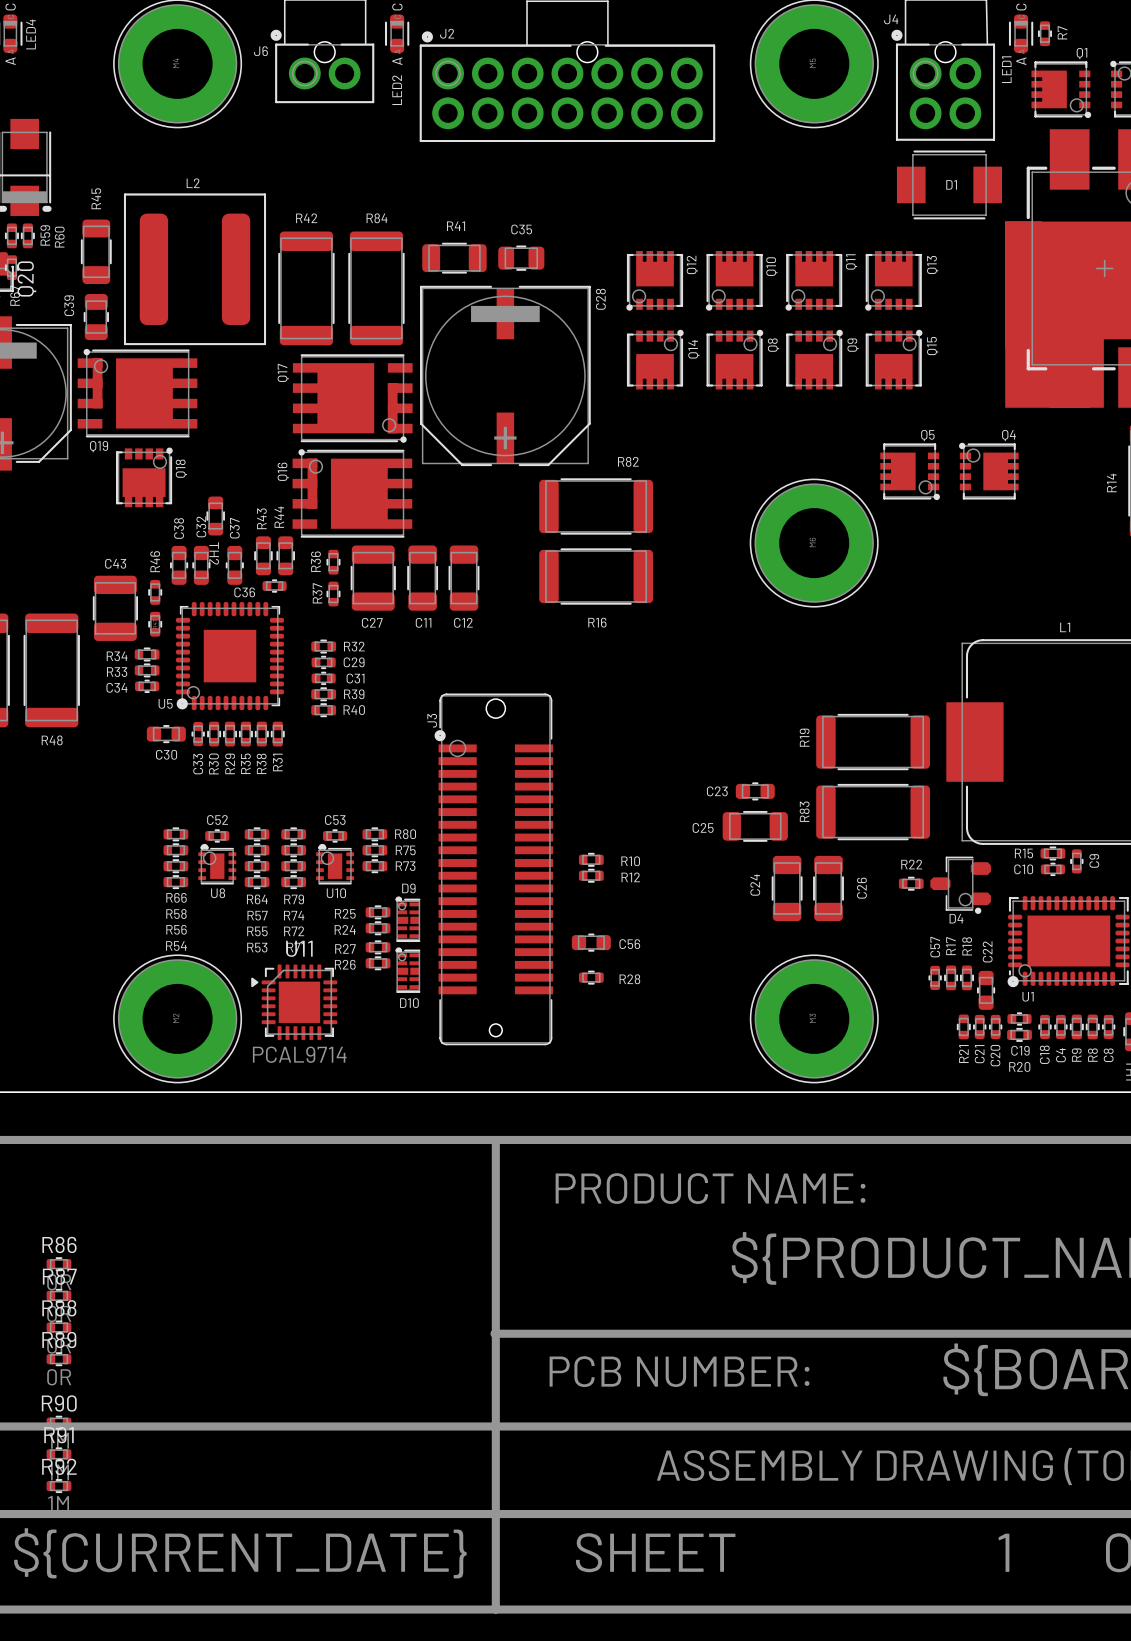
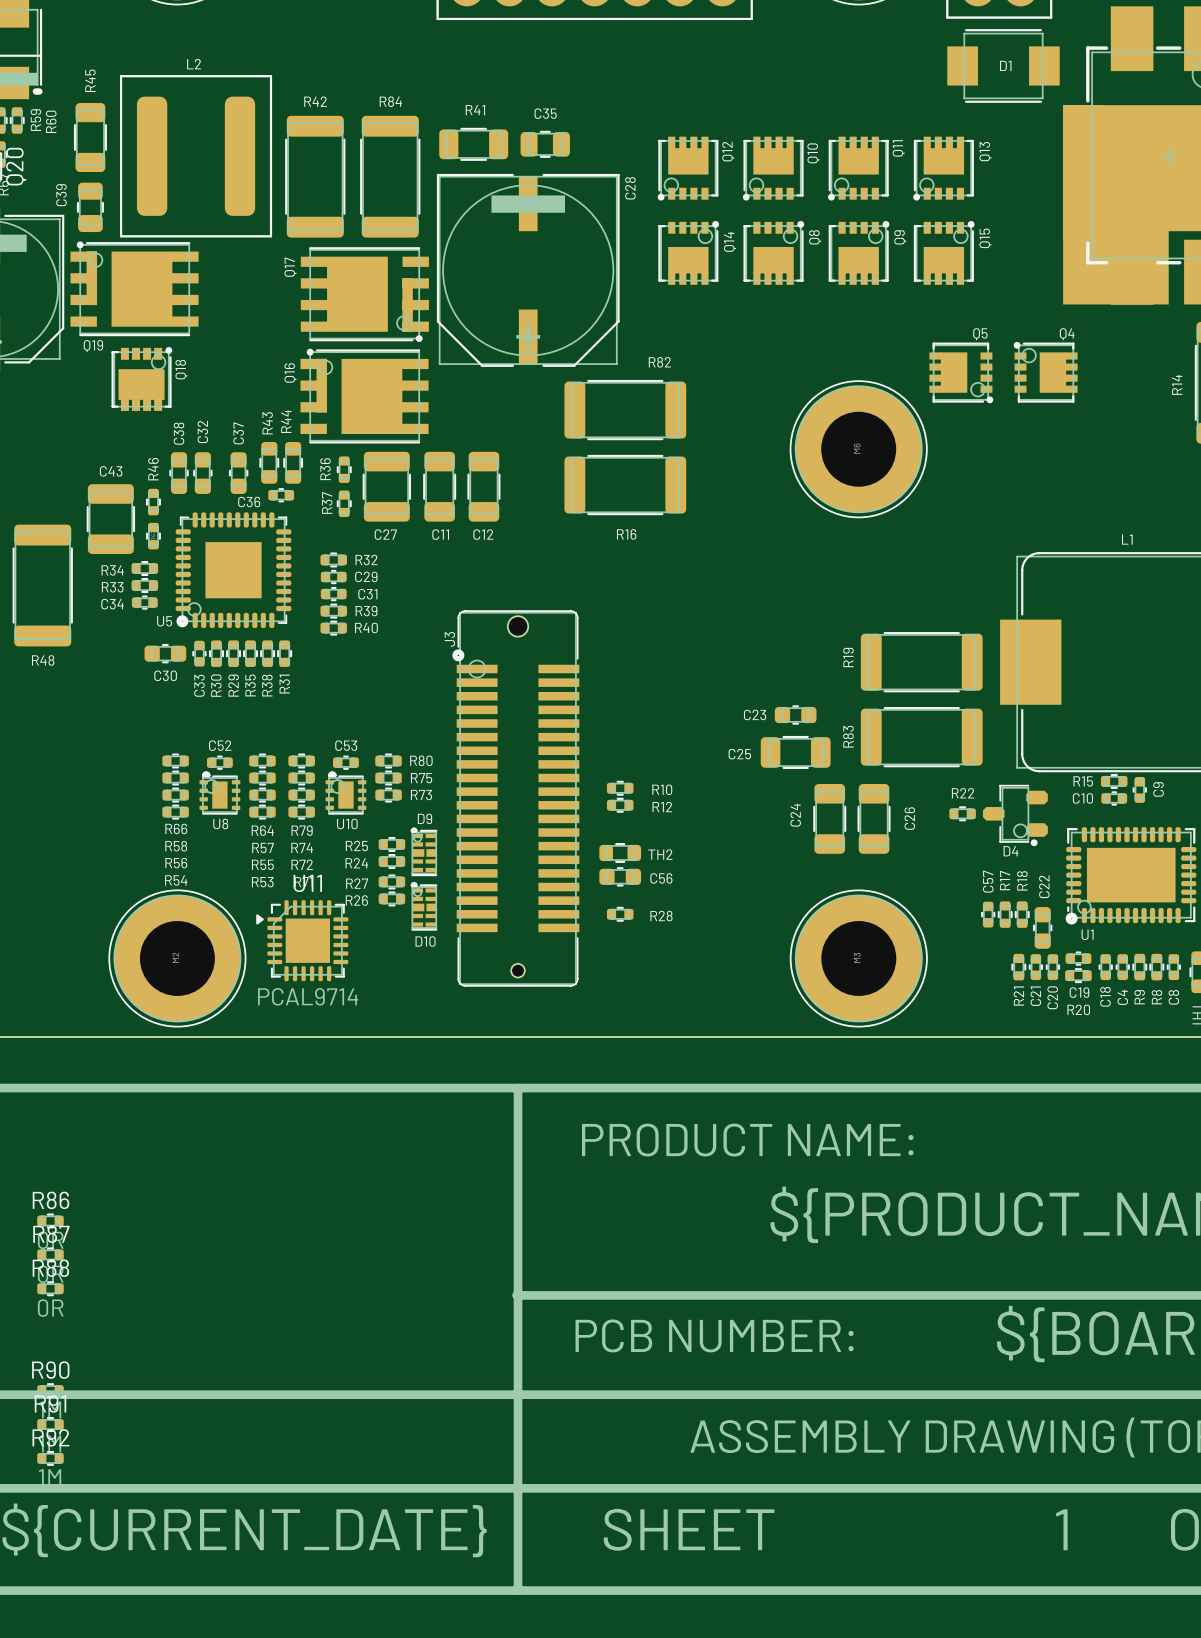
TH2 rotation: 0° (215, 516) -> 90° clockwise (620, 852)
TH2 position: (215, 516) -> (620, 852)
TH2 name position: TH2 (214, 553) -> TH2 (660, 854)
R89: 0R (58, 1359) -> none

